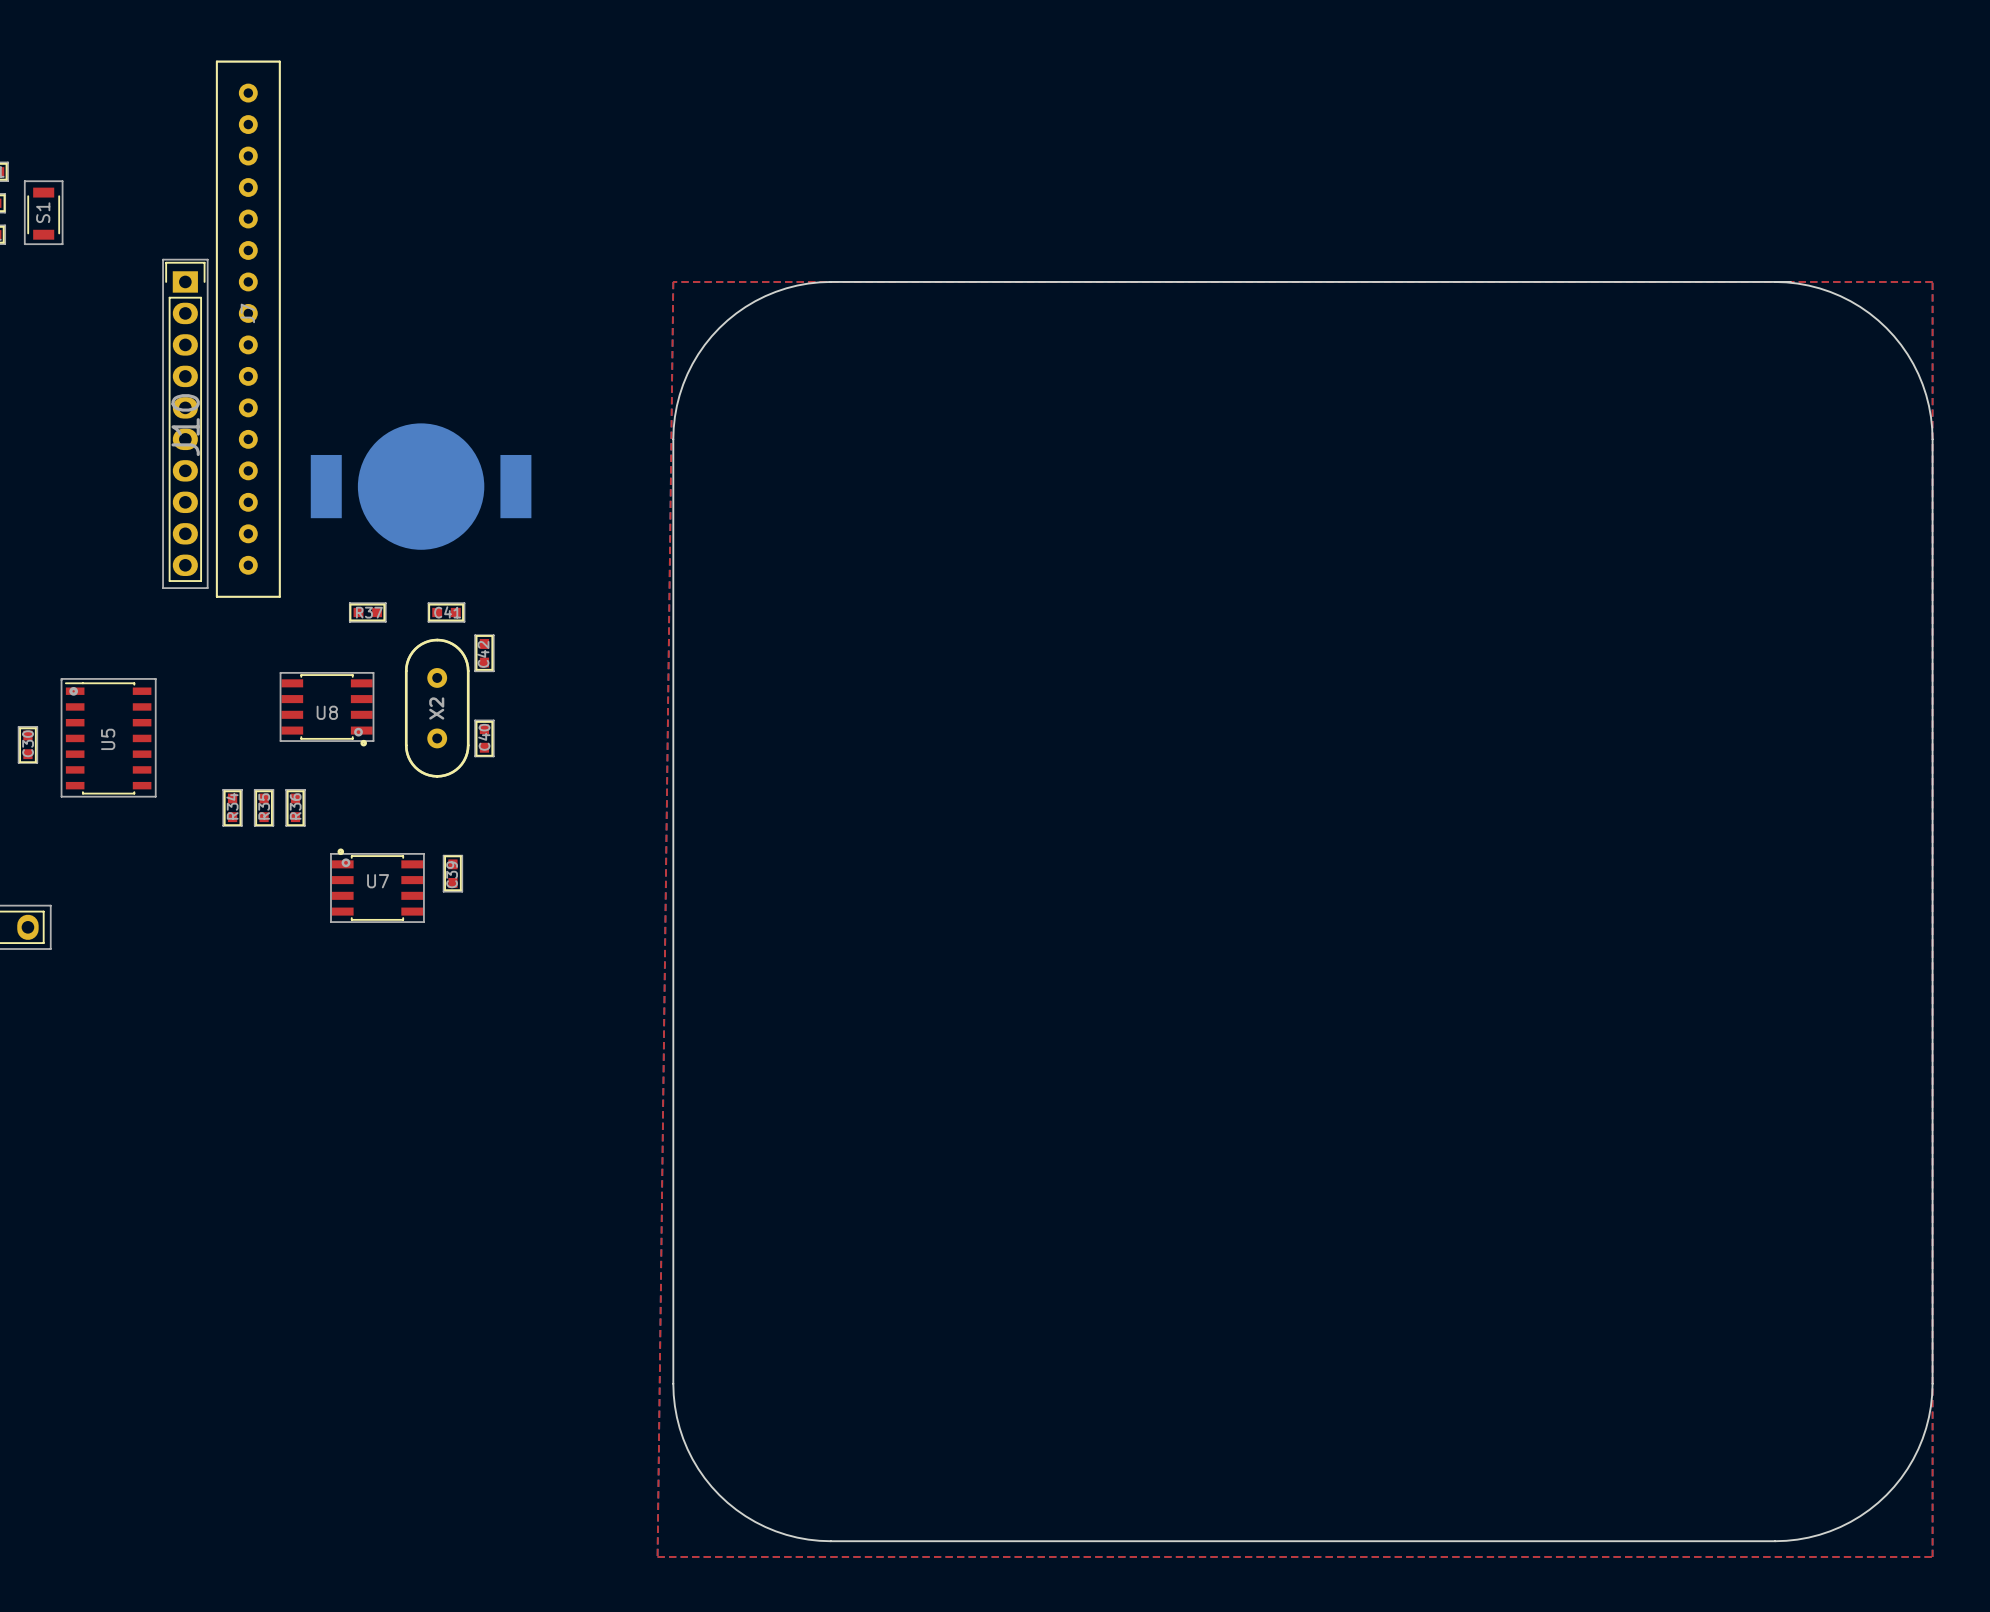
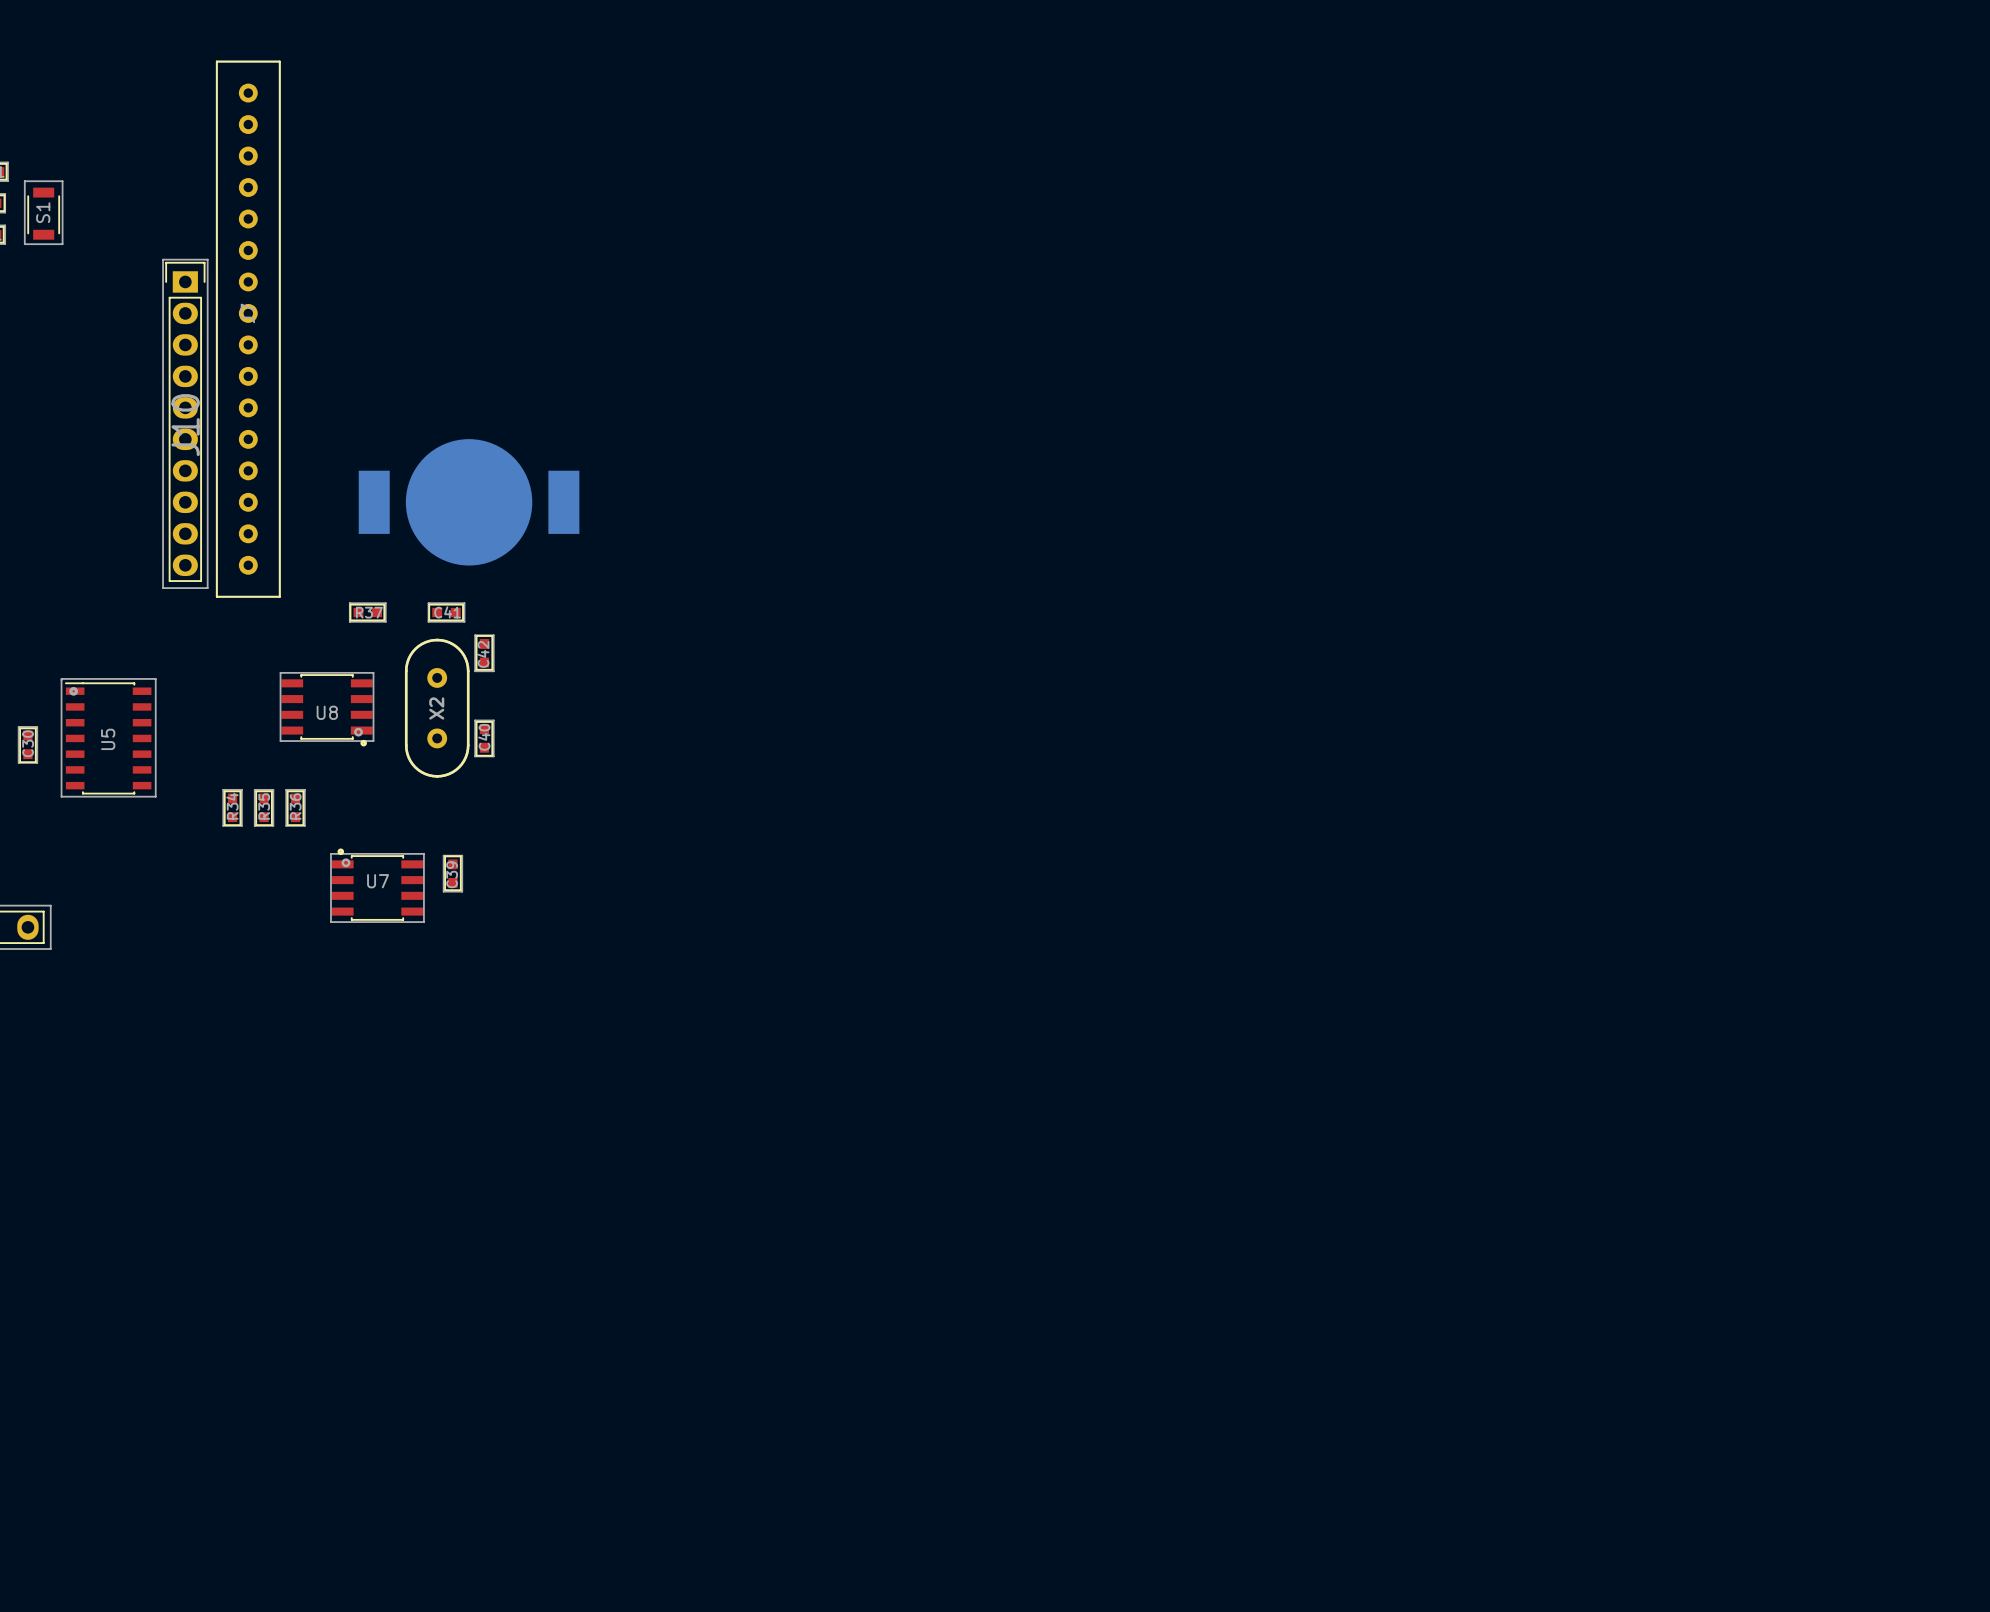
top zone outline: (673, 281) (1932, 281) (1932, 1556) (657, 1556) (673, 281) -> none
board edge: (1775, 281) (1808, 285) (1830, 291) (1850, 301) (1878, 320) (1894, 336) (1913, 363) (1926, 395) (1932, 428) (1932, 1395) (1928, 1417) (1922, 1438) (1907, 1468) (1894, 1486) (1869, 1509) (1840, 1526) (1808, 1537) (1775, 1541) (819, 1540) (797, 1537) (765, 1526) (745, 1516) (727, 1502) (704, 1478) (687, 1449) (676, 1417) (673, 1383) (673, 428) (676, 405) (683, 384) (692, 363) (711, 336) (736, 313) (765, 296) (797, 285) (819, 282) (830, 281) (1790, 281) -> none
part position: (421, 486) -> (469, 502)

